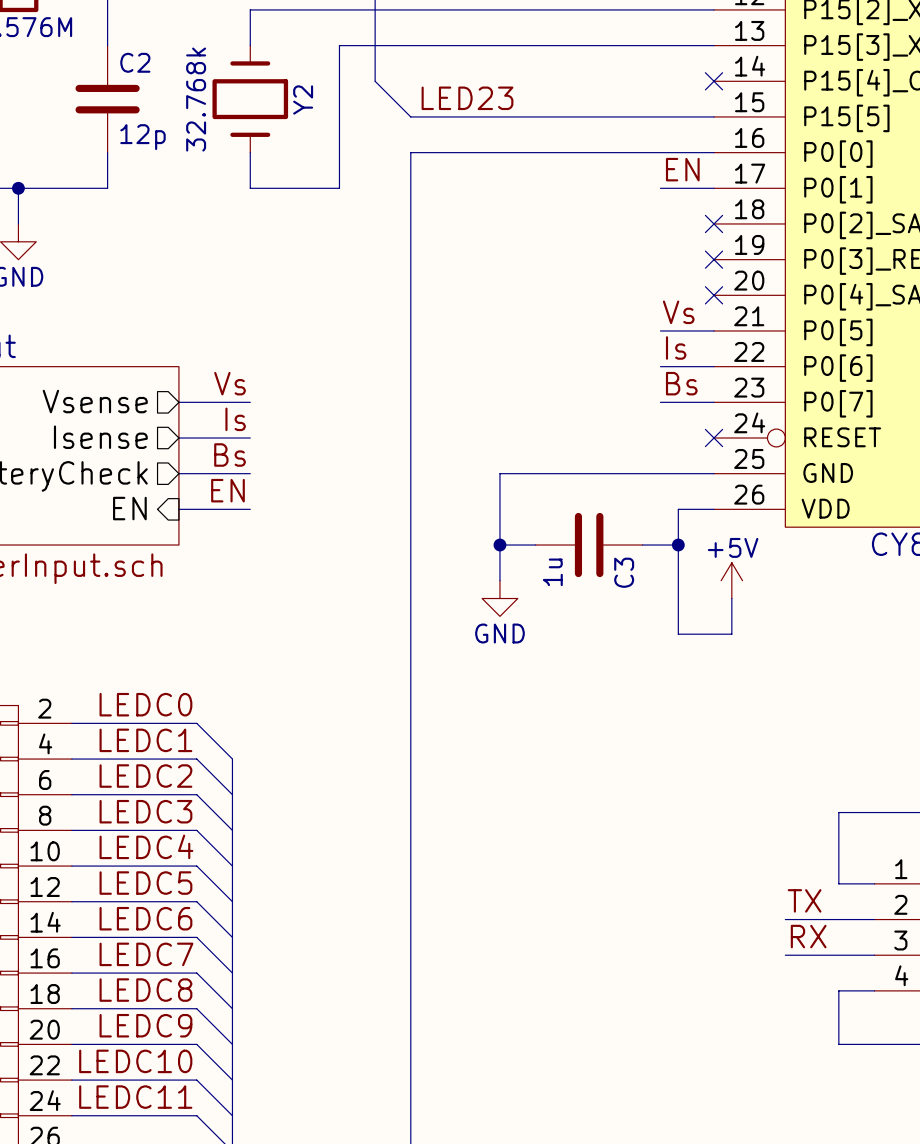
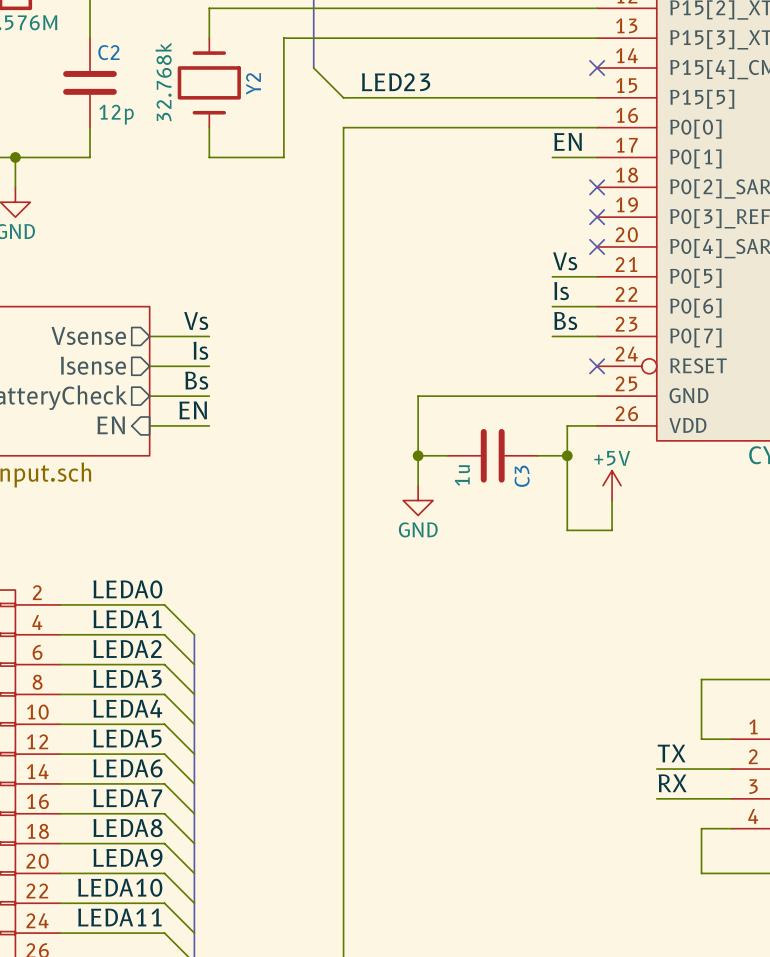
label: LEDC0 (145, 704) -> LEDA0 (127, 589)
label: LEDC1 (145, 740) -> LEDA1 (127, 619)
label: LEDC2 (145, 776) -> LEDA2 (127, 648)
label: LEDC3 (145, 811) -> LEDA3 (127, 678)
label: LEDC4 (146, 846) -> LEDA4 (127, 708)
label: LEDC5 (145, 883) -> LEDA5 (127, 738)
label: LEDC6 (145, 918) -> LEDA6 (127, 768)
label: LEDC7 (146, 954) -> LEDA7 (127, 798)
label: LEDC8 (145, 990) -> LEDA8 (128, 828)
label: LEDC9 (145, 1025) -> LEDA9 (127, 857)
label: LEDC10 (135, 1061) -> LEDA10 (120, 887)
label: LEDC11 (135, 1097) -> LEDA11 (119, 917)

